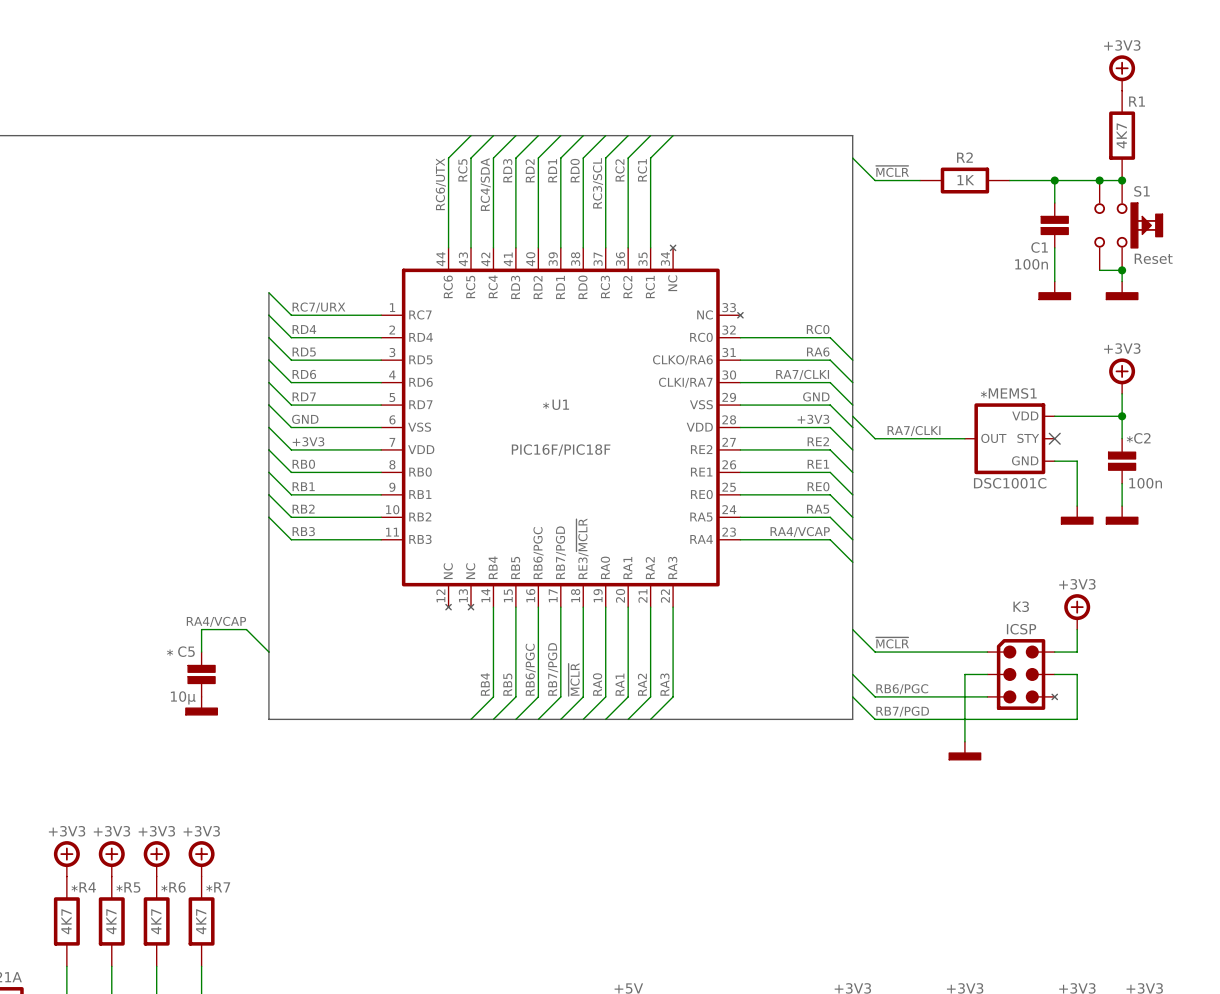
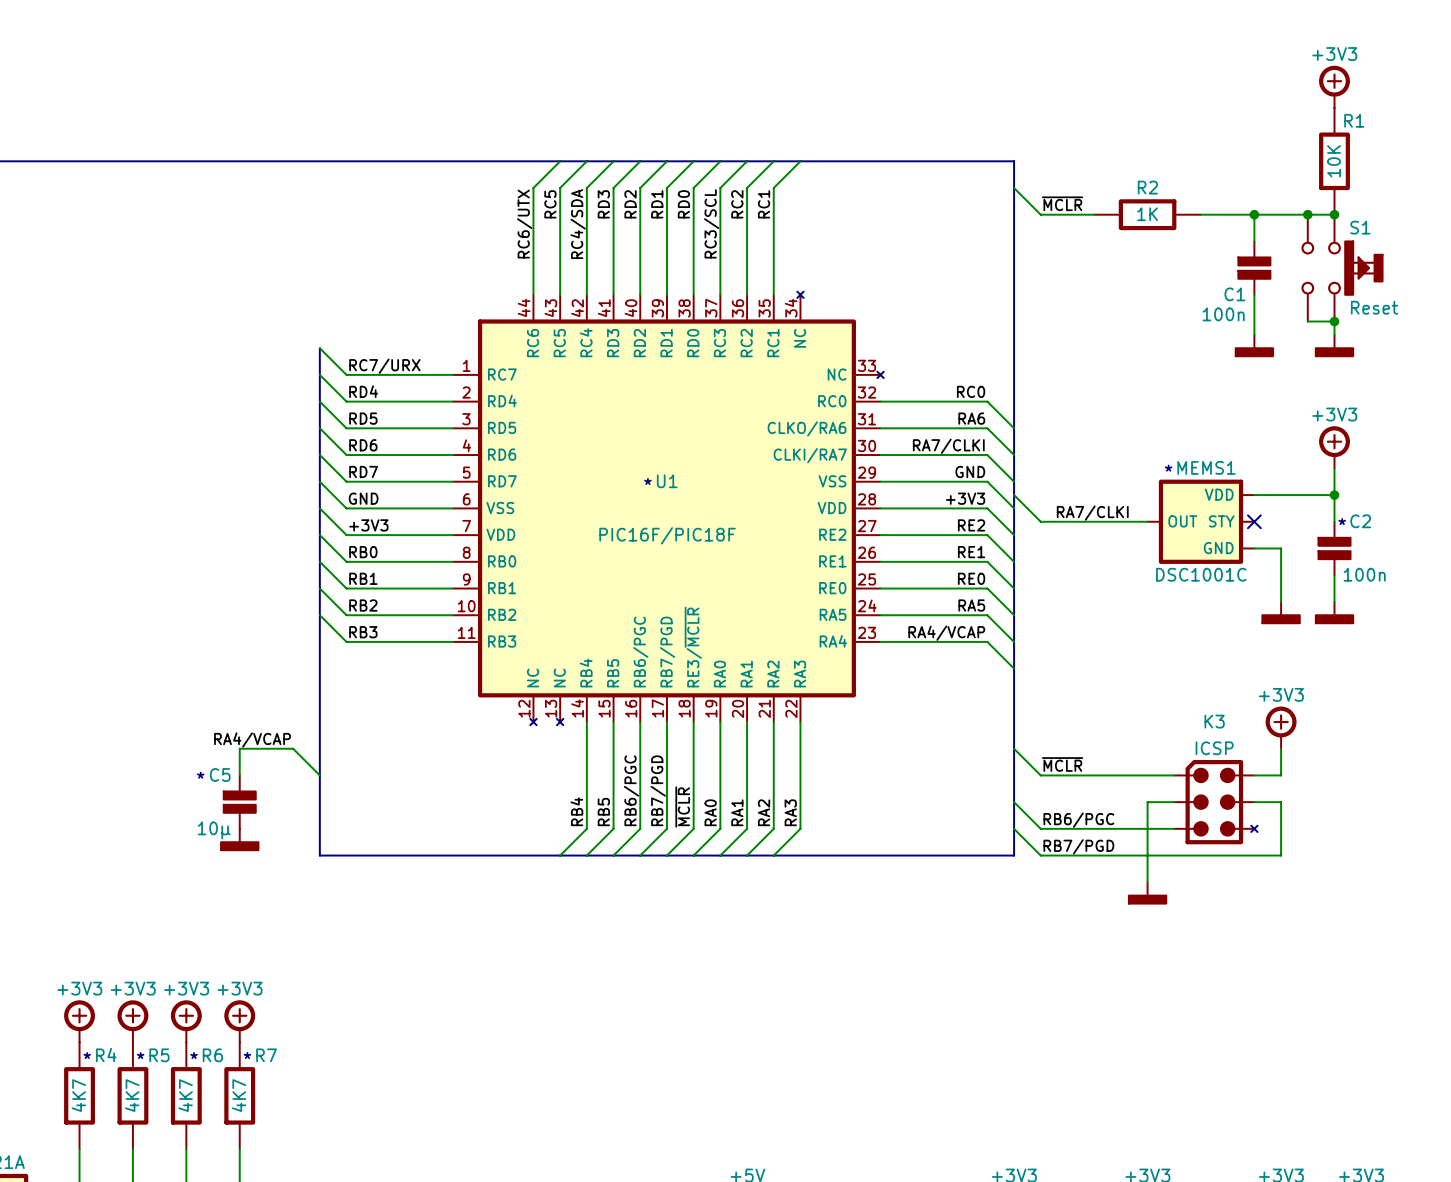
R1 value: 4K7 (1121, 135) -> 10K (1334, 161)

